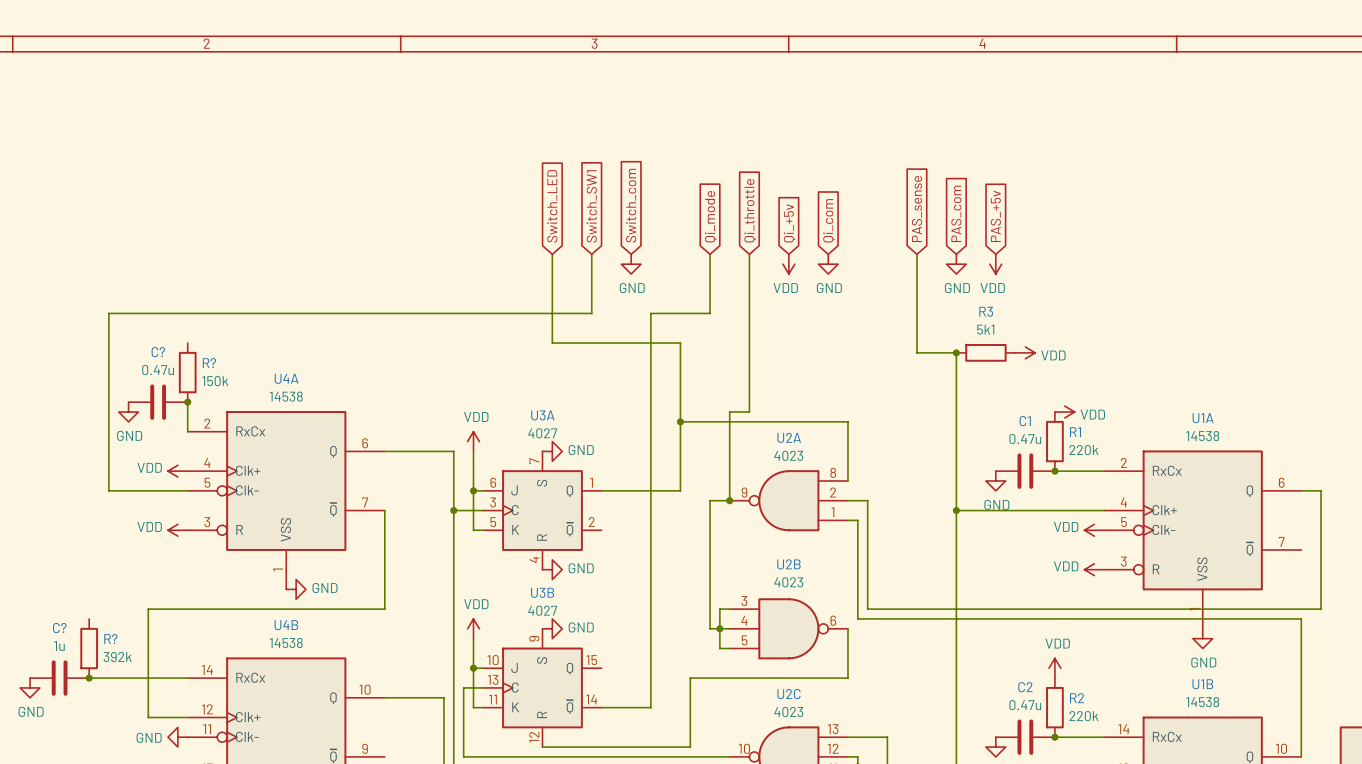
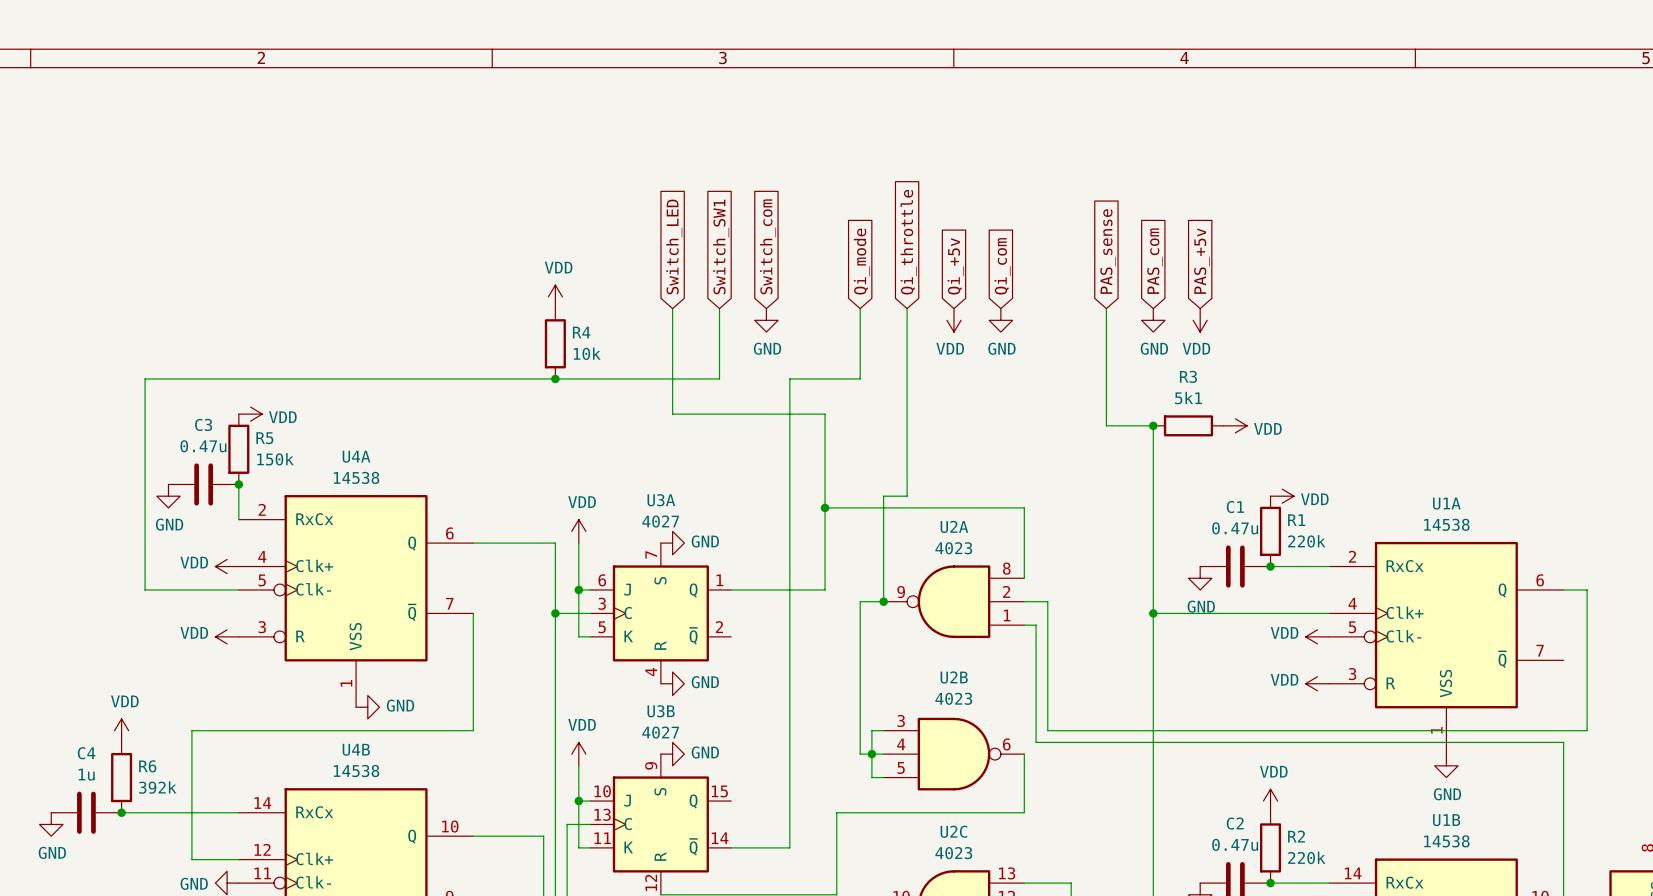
power symbol: none -> VDD (555, 296)
R4: none -> 10k (555, 343)
junction: none -> (555, 378)
power symbol: none -> VDD (250, 414)
C? name: C? (158, 352) -> C3 (203, 424)
R? name: R? (209, 363) -> R5 (264, 438)
power symbol: none -> VDD (121, 730)
C? name: C? (59, 628) -> C4 (86, 753)
R? name: R? (110, 639) -> R6 (147, 766)

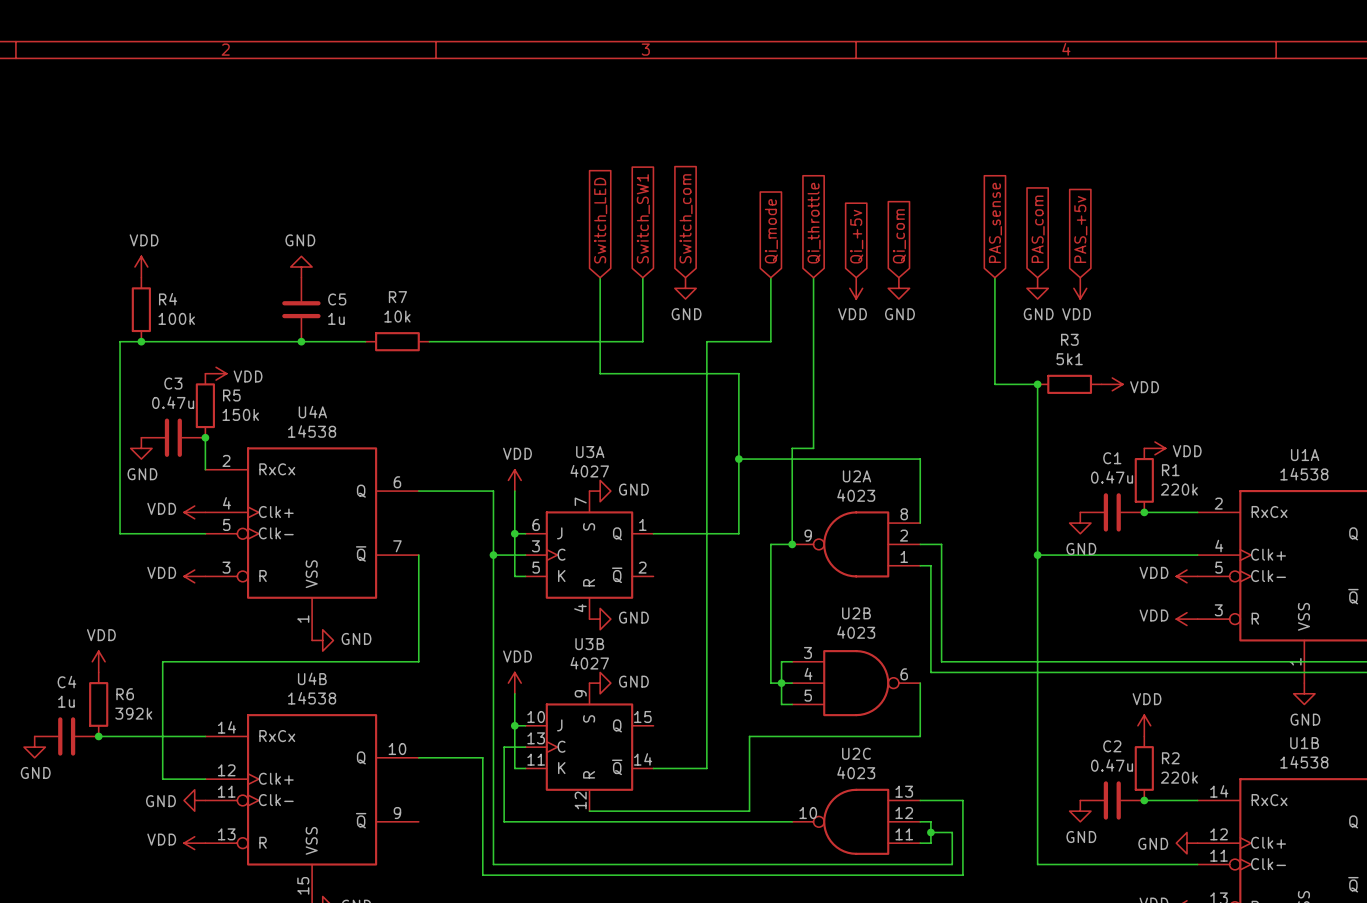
power symbol: none -> VDD (141, 267)
power symbol: none -> GND (301, 267)
power symbol: VDD (555, 296) -> none
C5: none -> 1u (301, 309)
R4 position: (555, 343) -> (141, 309)
R4 value: 10k (587, 353) -> 100k (176, 318)
junction: none -> (141, 341)
junction: none -> (301, 341)
wire: (414, 378) (485, 378) -> none
R7: none -> 10k (397, 341)
junction: (555, 378) -> none

